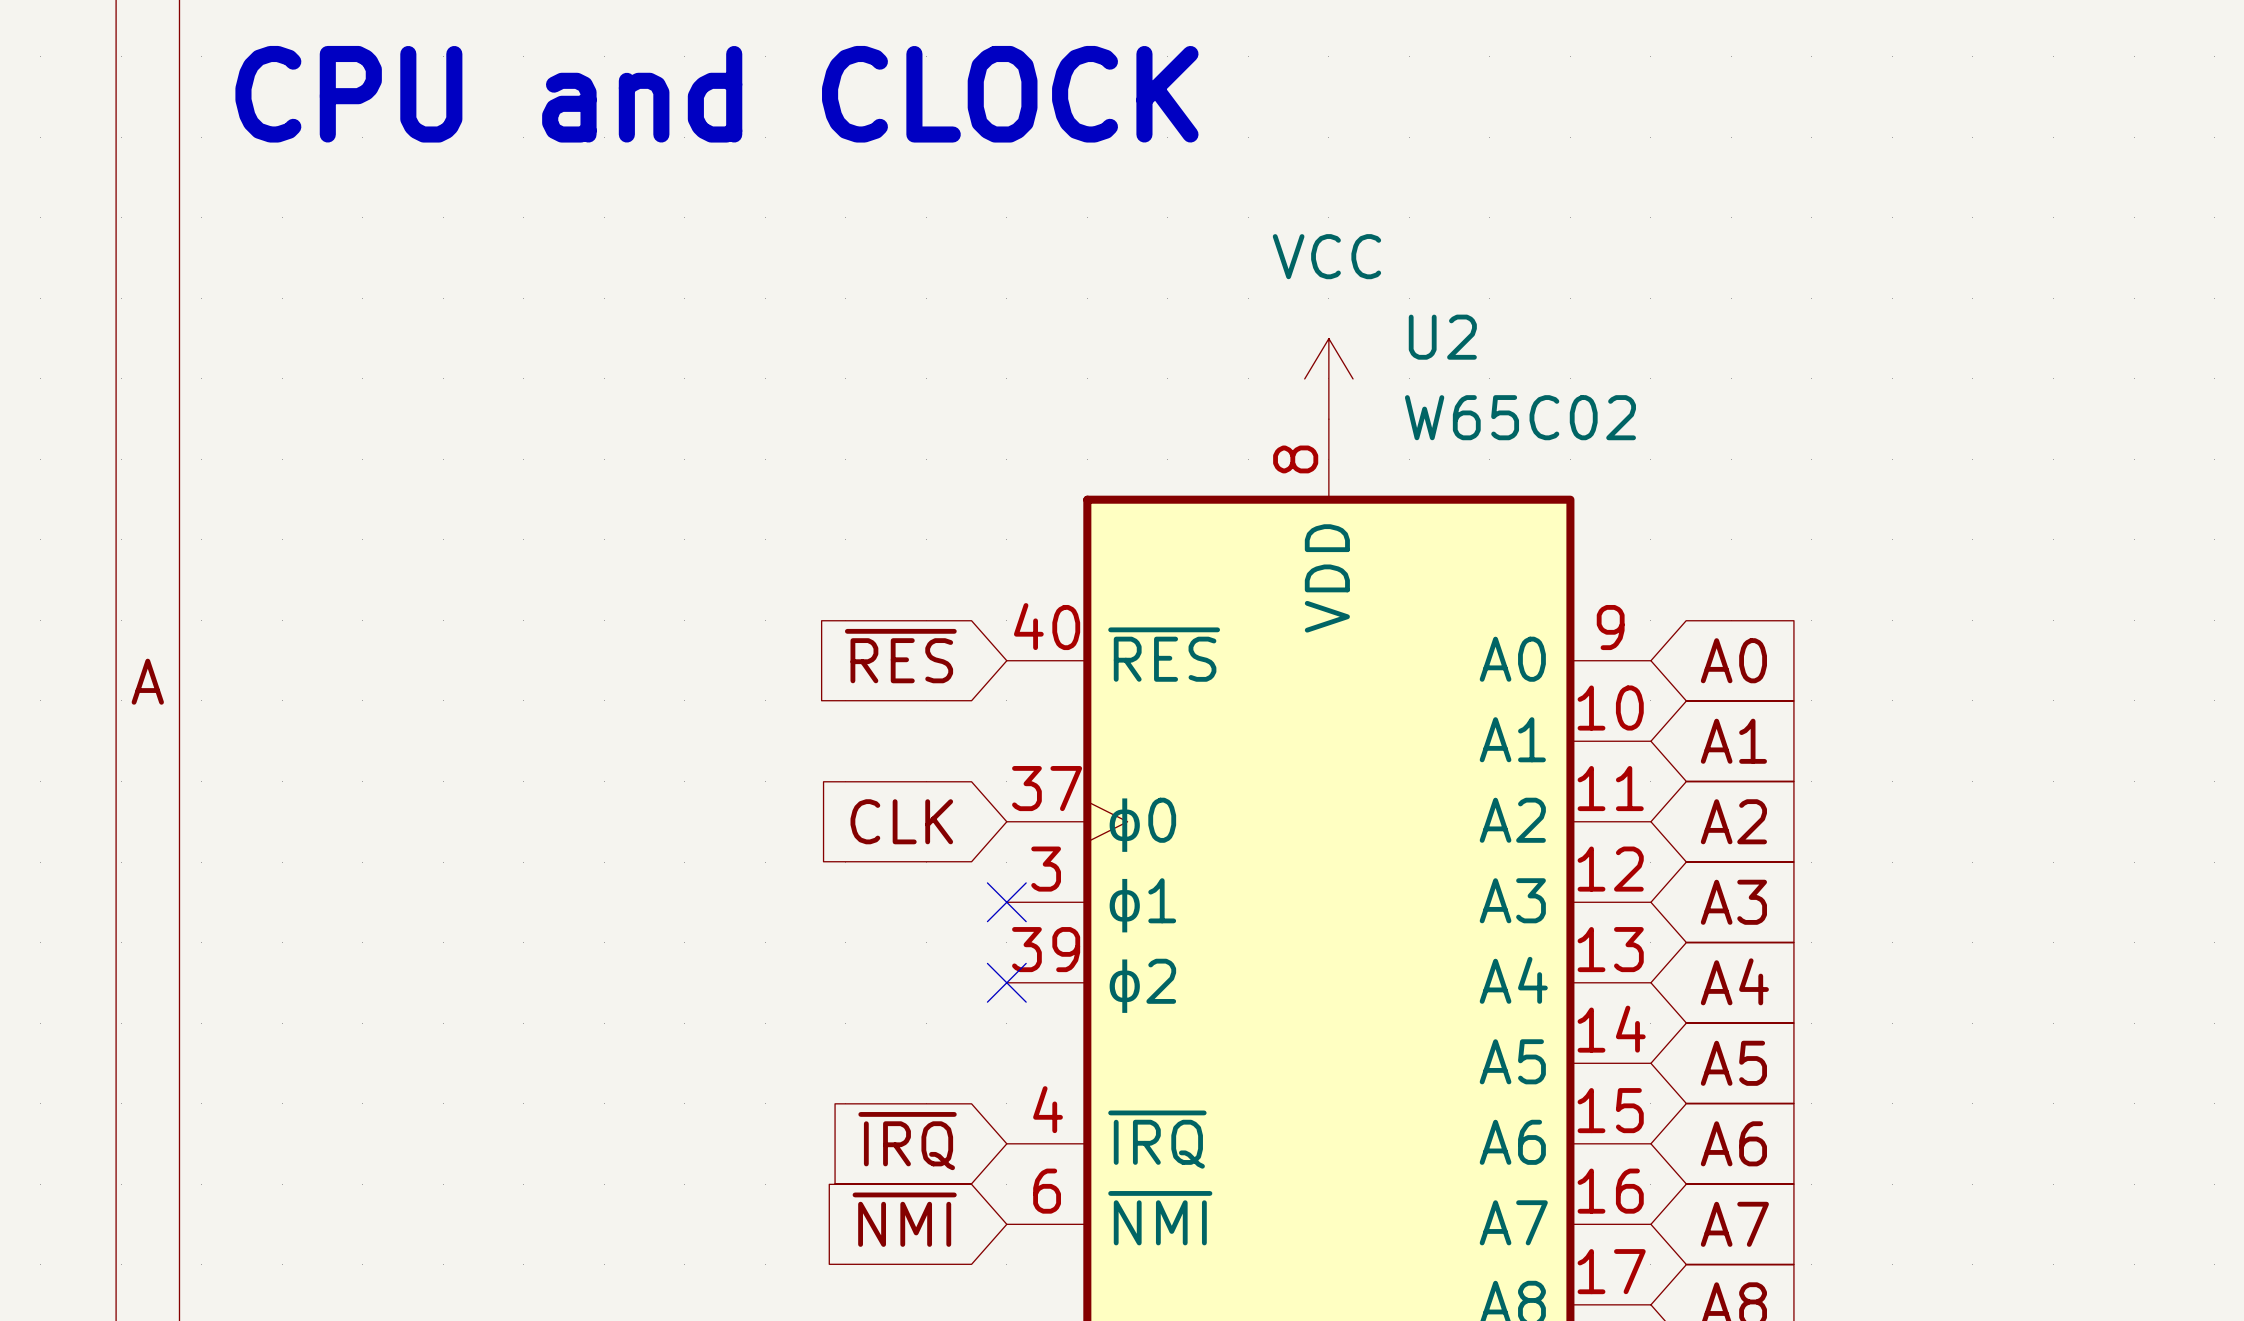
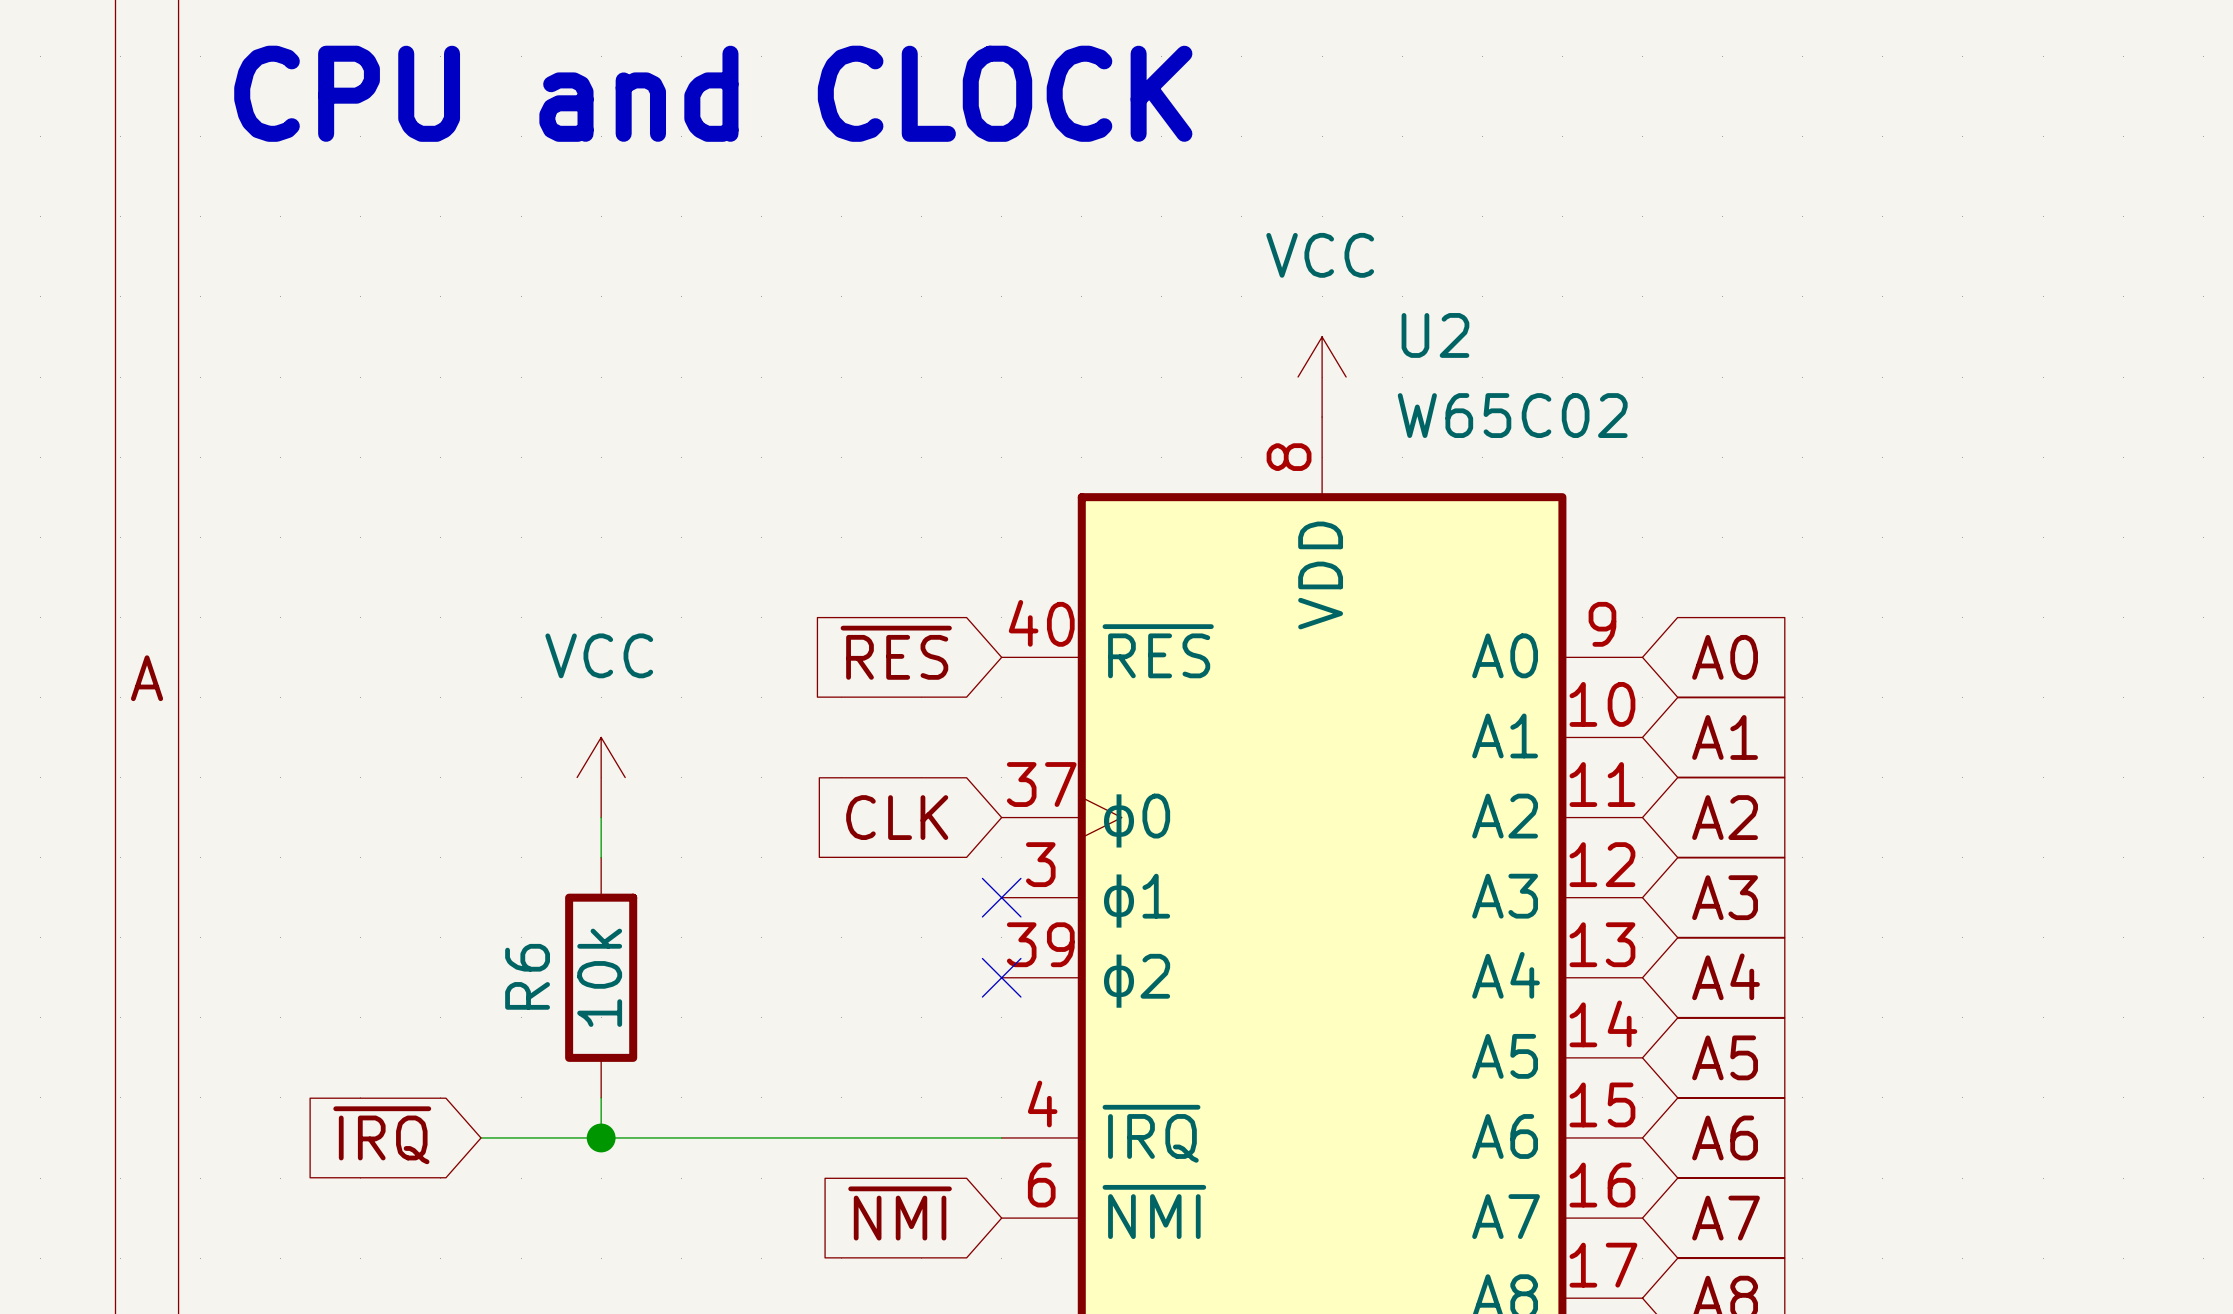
power symbol: none -> VCC (601, 777)
wire: none -> (601, 817) (601, 857)
R6: none -> 10k (601, 977)
wire: none -> (601, 1097) (601, 1137)
global label position: ~{IRQ} (907, 1141) -> ~{IRQ} (382, 1135)
wire: none -> (481, 1137) (1001, 1137)
junction: none -> (601, 1137)

